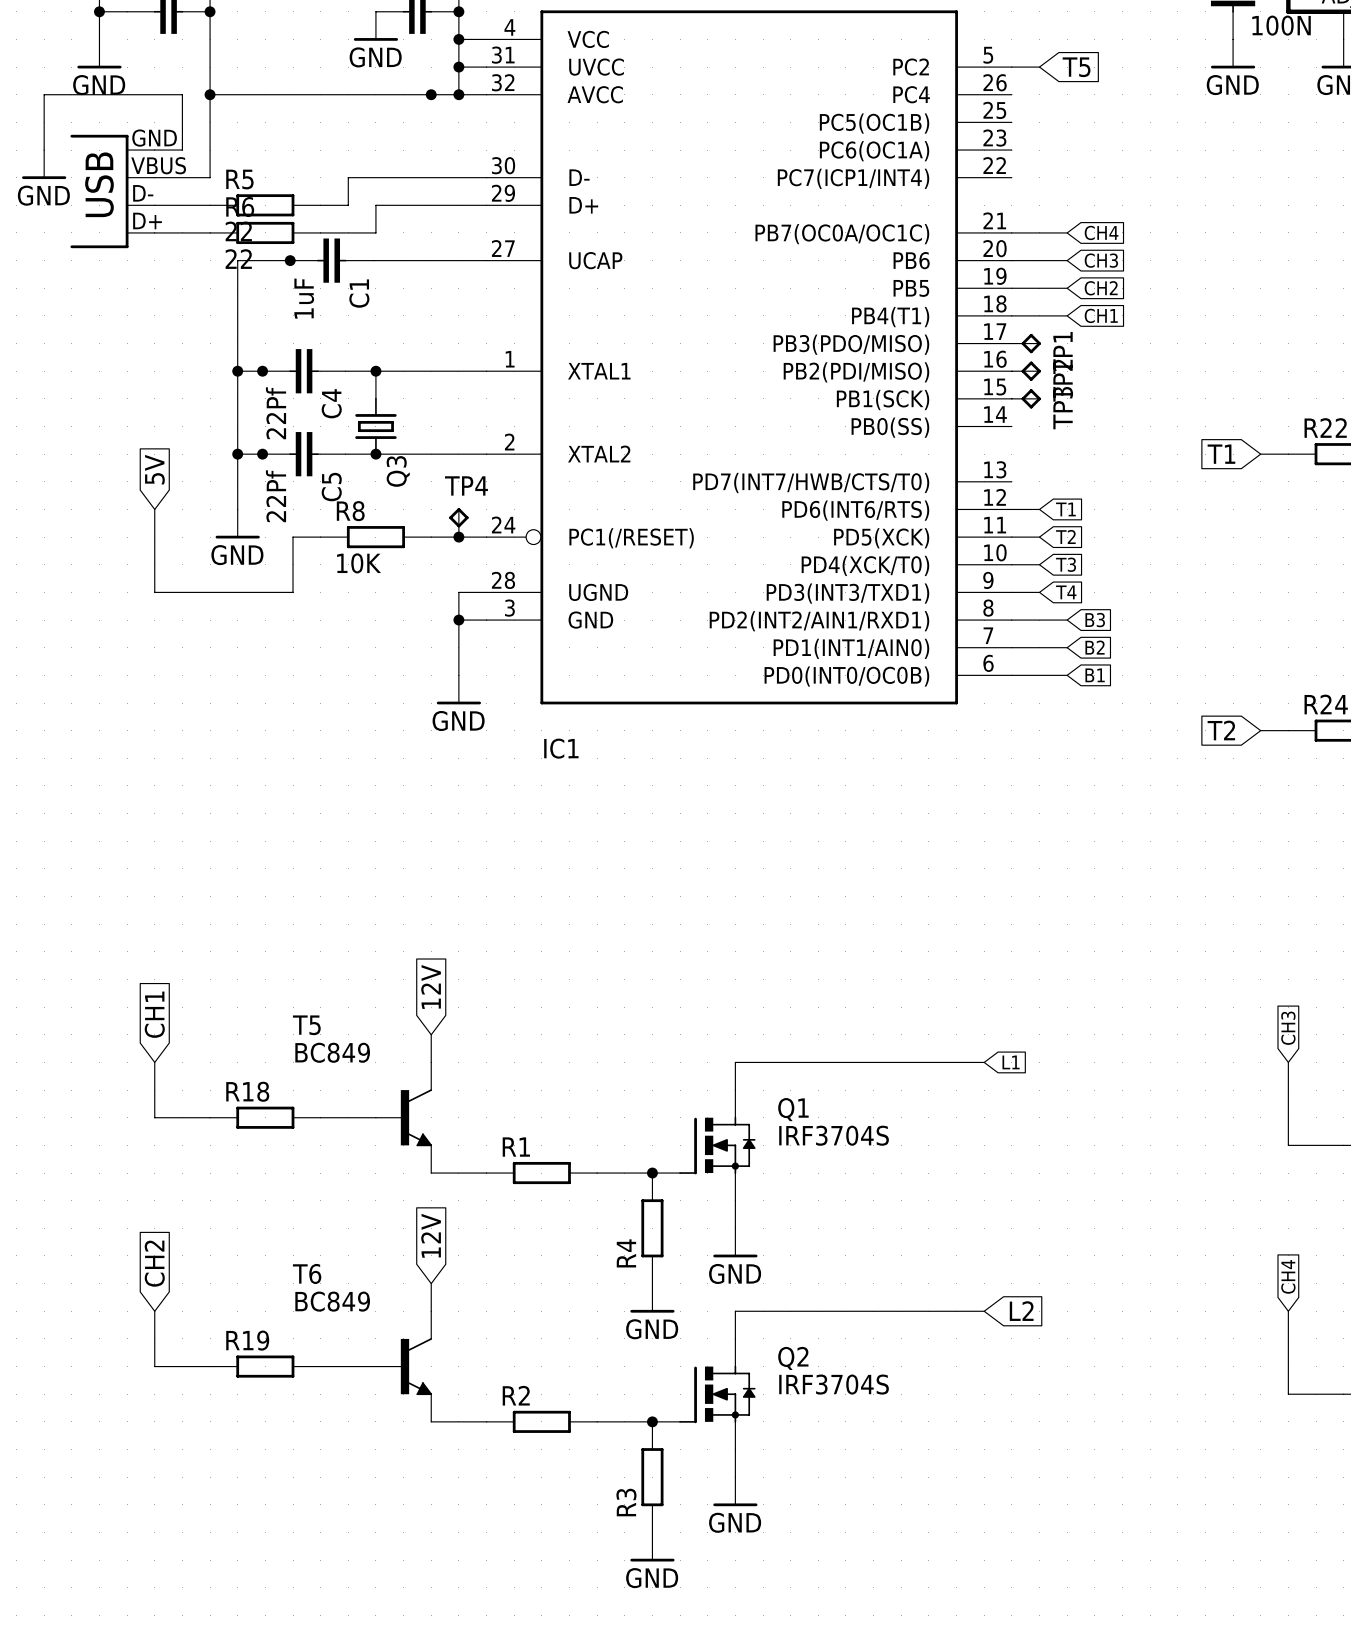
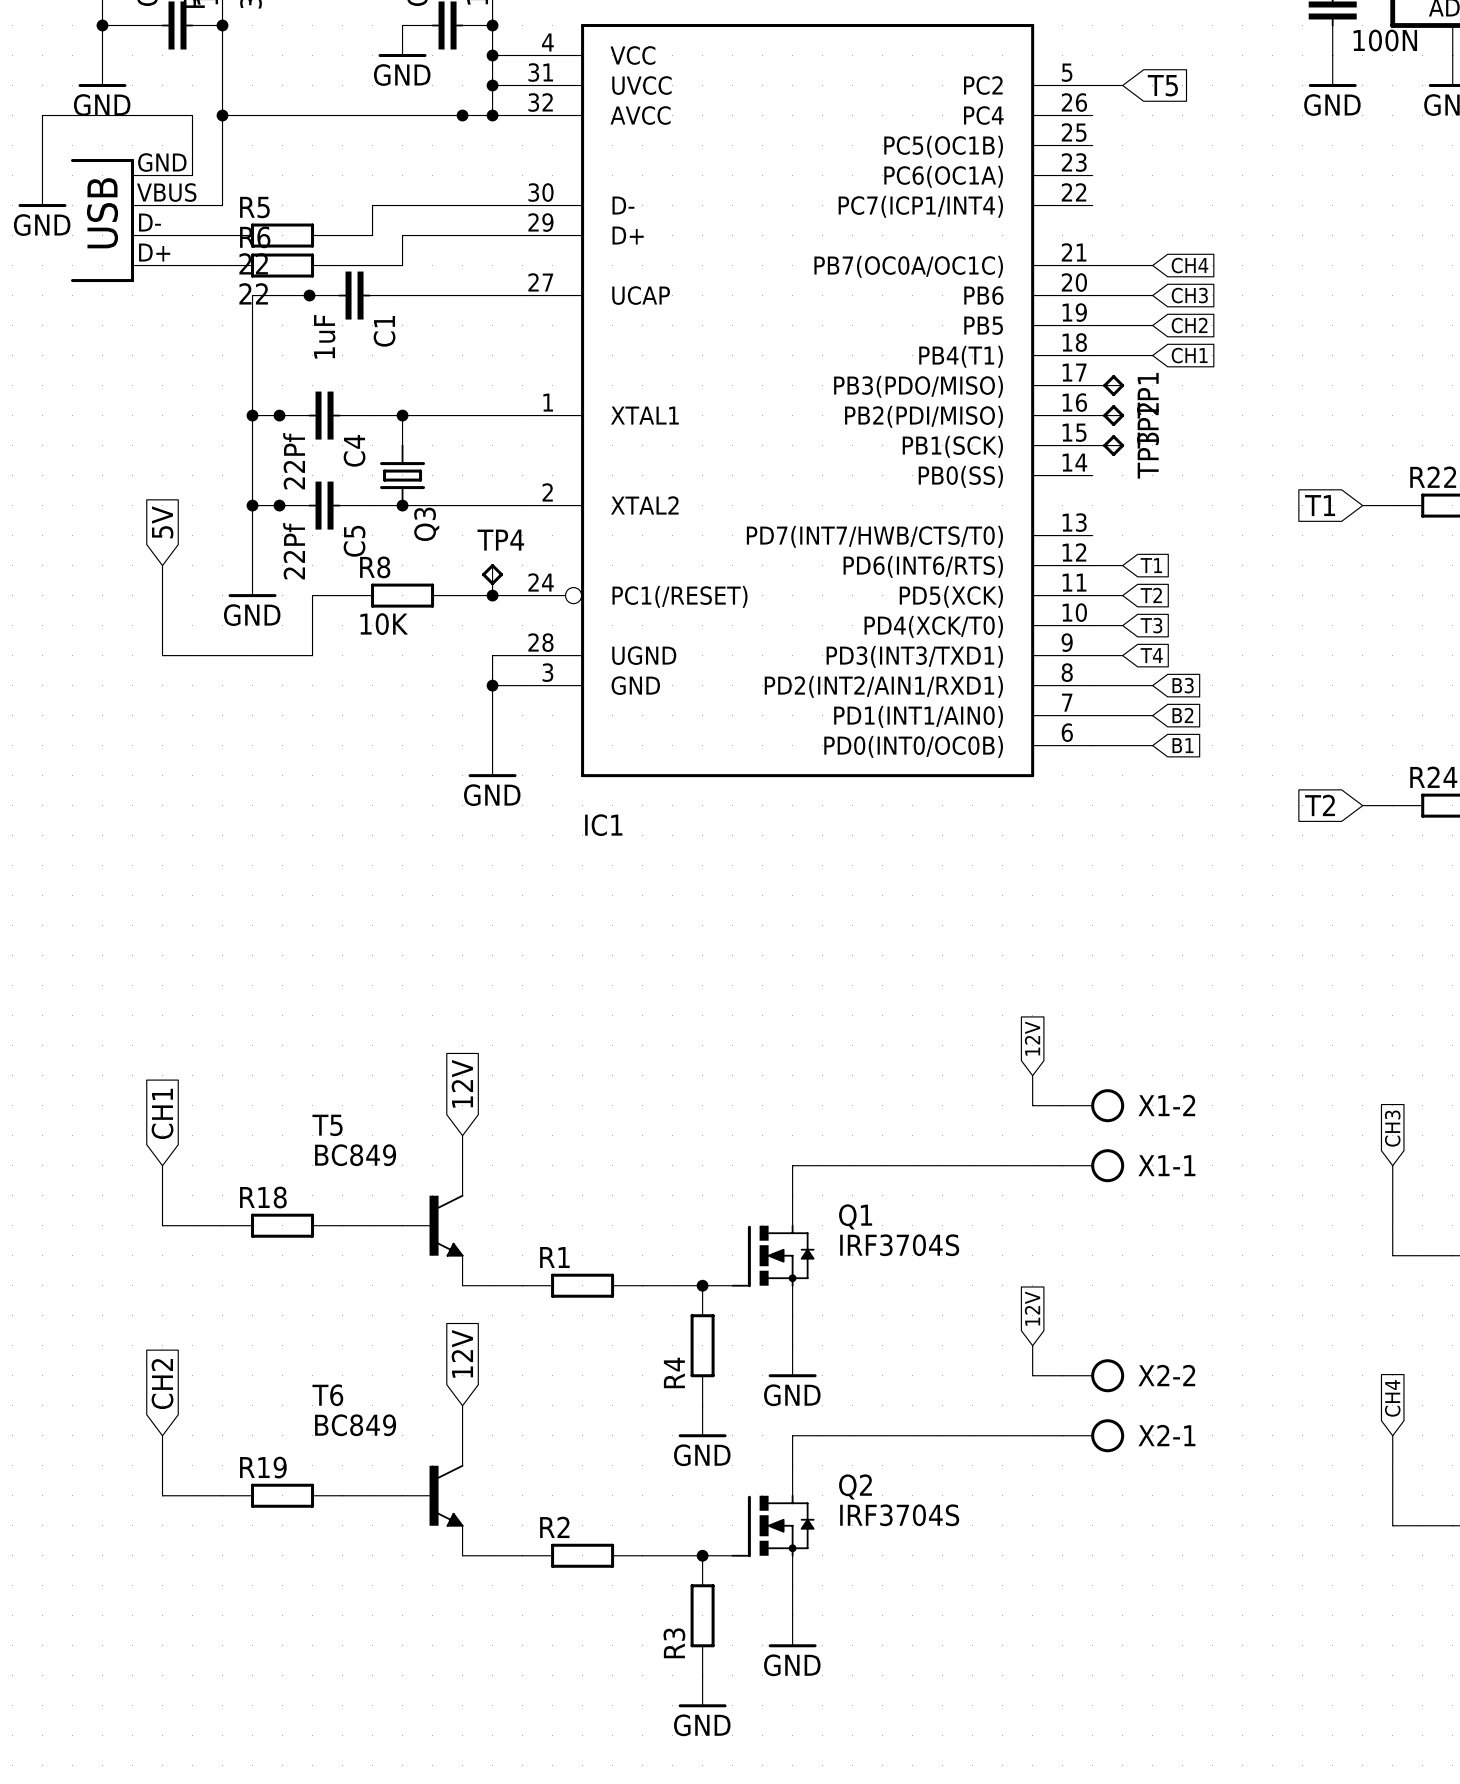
global label: none -> 12V (1032, 1038)
wire: none -> (1032, 1075) (1032, 1105) (1062, 1105)
X1-2: none -> (1093, 1105)
global label: L1 (1011, 1062) -> none
X1-1: none -> (1093, 1165)
global label: none -> 12V (1032, 1308)
wire: none -> (1032, 1345) (1032, 1375) (1062, 1375)
X2-2: none -> (1093, 1375)
X2-1: none -> (1093, 1435)
global label: L2 (1021, 1311) -> none

